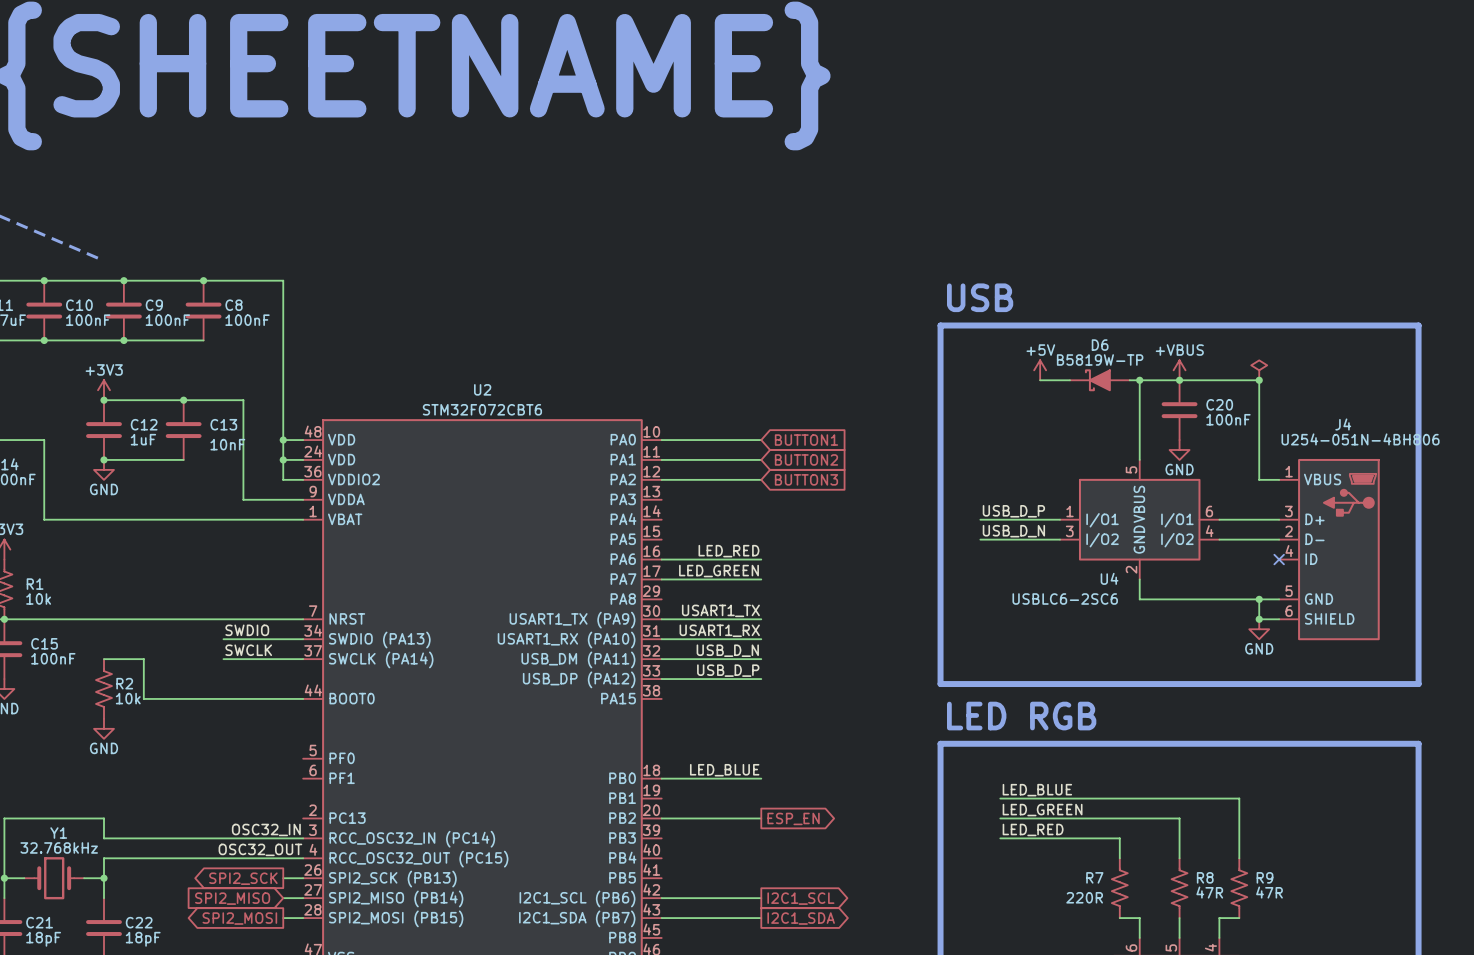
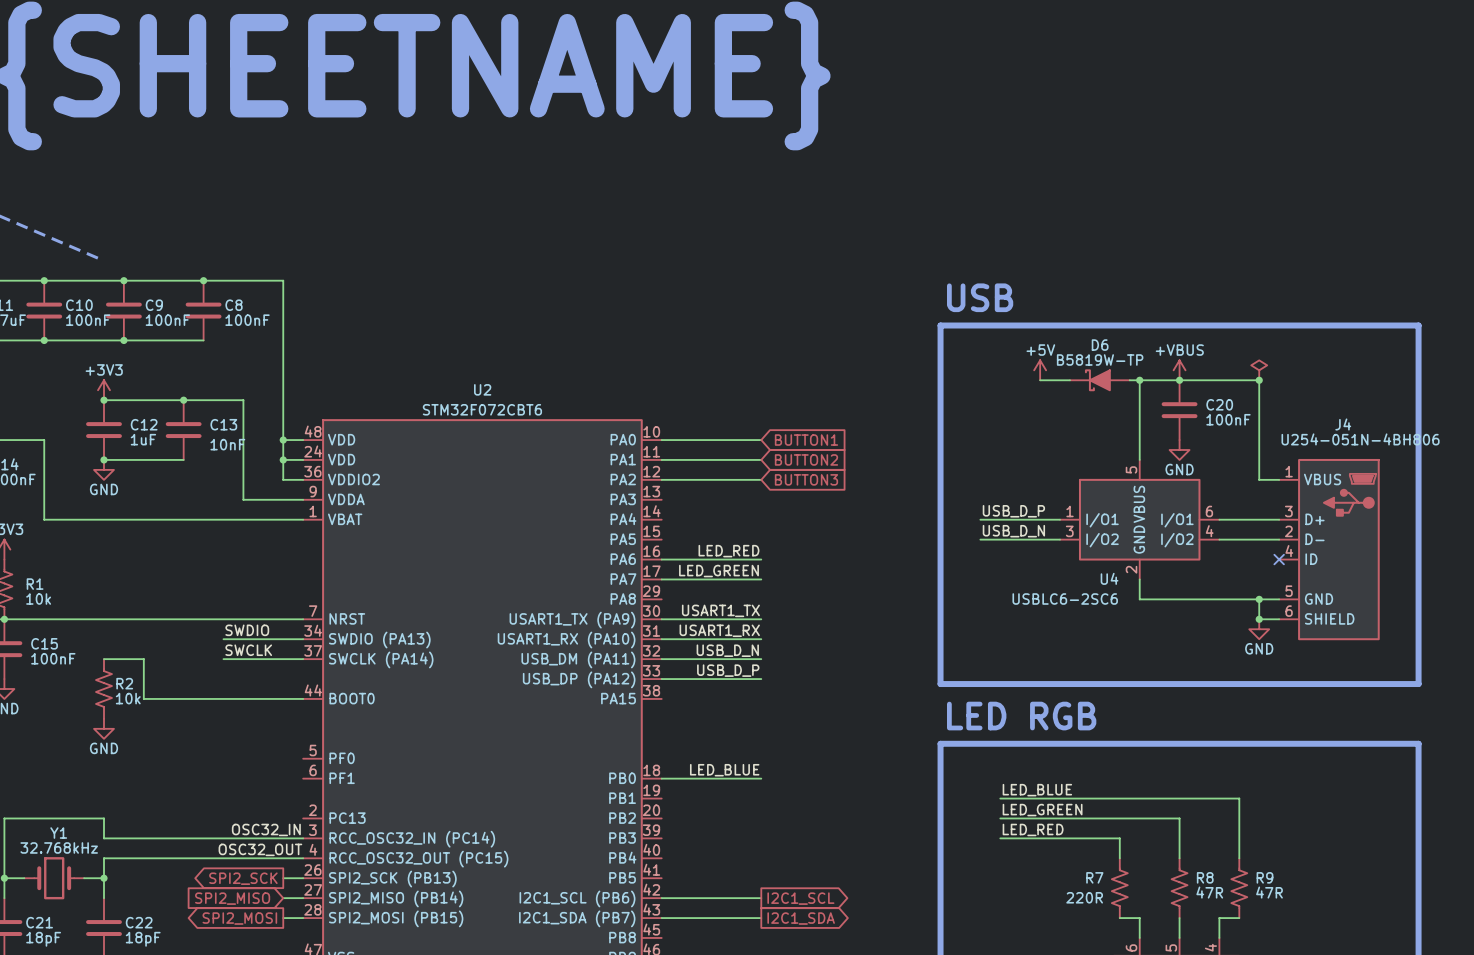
wire: (661, 818) (761, 818) -> none
global label: ESP_EN (793, 818) -> none

